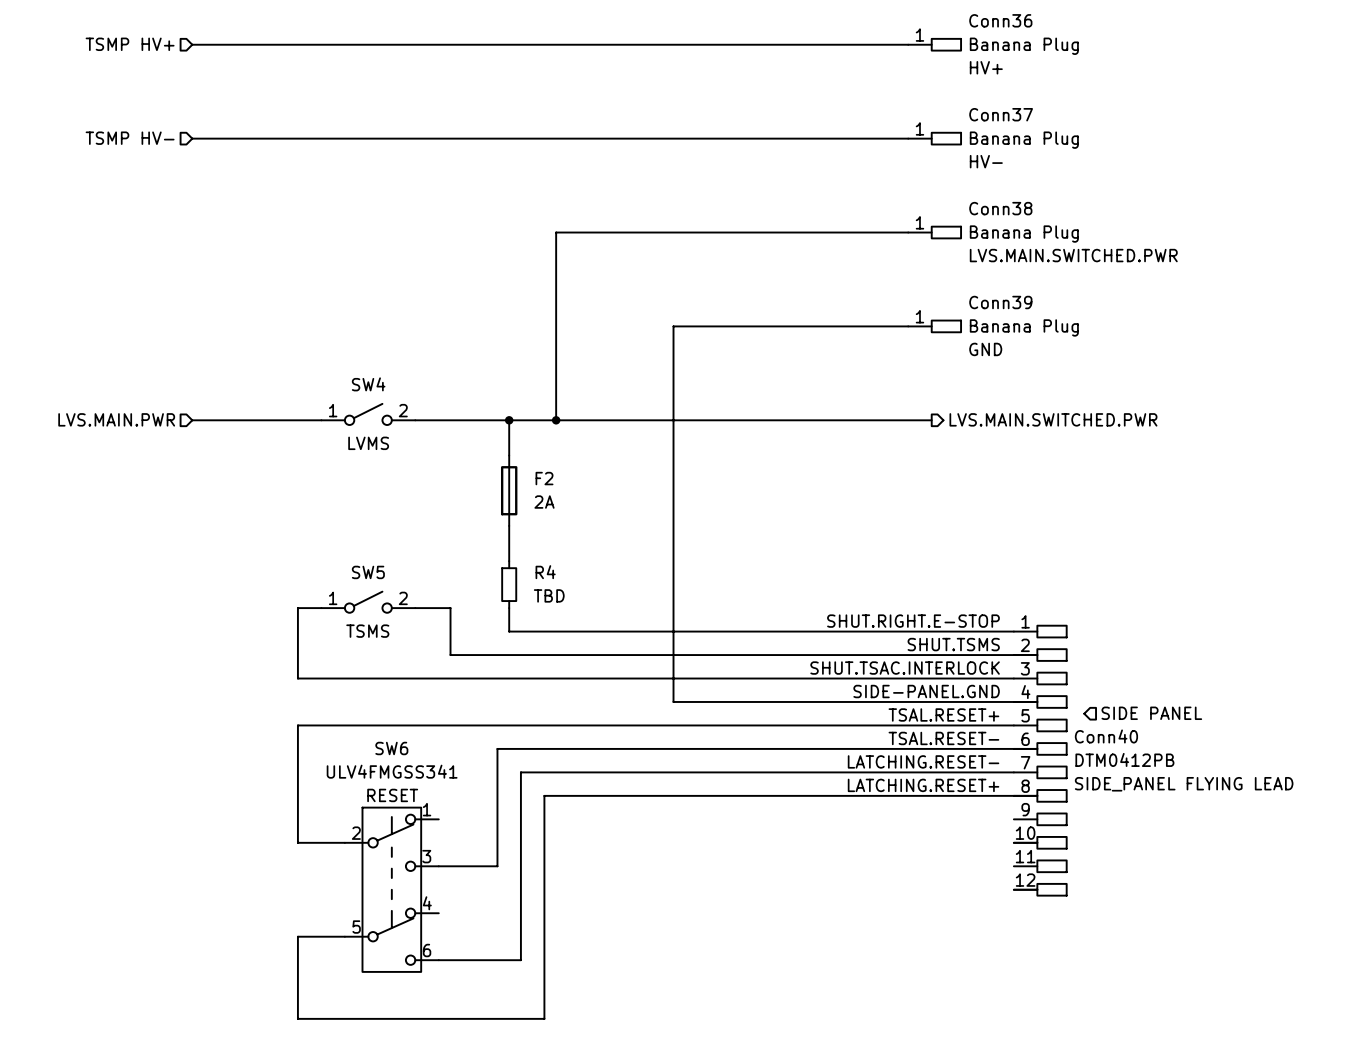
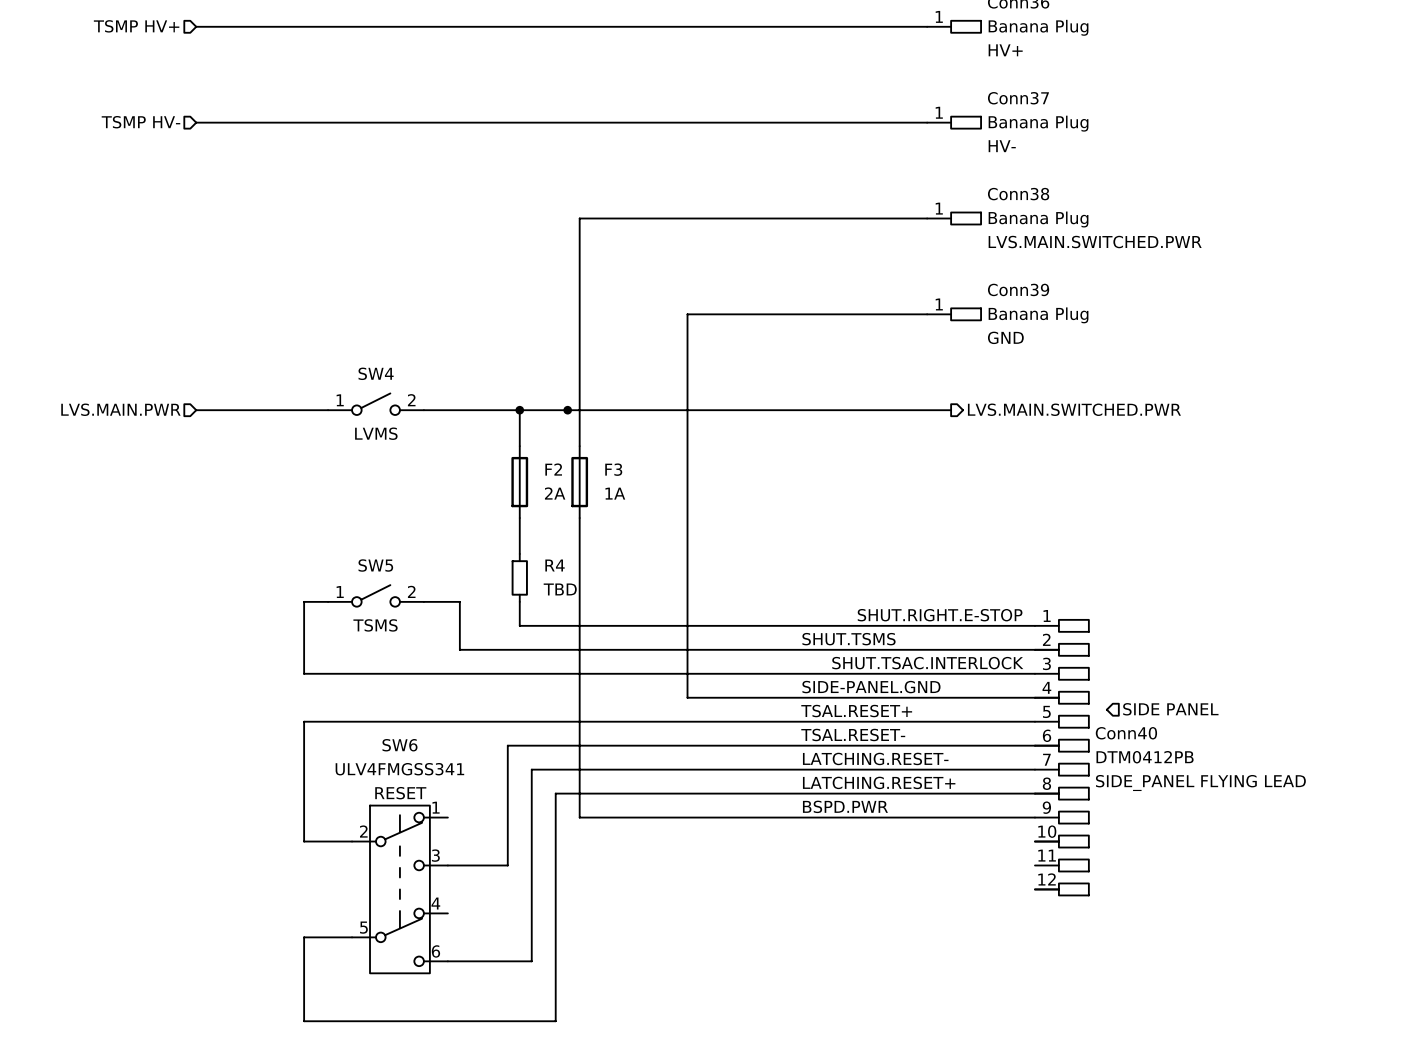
wire: (567, 232) (556, 232) (556, 420) -> (579, 218) (579, 446)
F3: none -> 1A (579, 482)
wire: none -> (579, 518) (579, 817) (1034, 817)
label position: SHUT.TSMS (953, 644) -> SHUT.TSMS (849, 639)
label position: SIDE-PANEL.GND (926, 691) -> SIDE-PANEL.GND (871, 687)
label position: TSAL.RESET+ (943, 714) -> TSAL.RESET+ (856, 711)
label position: TSAL.RESET- (943, 738) -> TSAL.RESET- (853, 734)
label position: LATCHING.RESET- (923, 761) -> LATCHING.RESET- (875, 758)
label position: LATCHING.RESET+ (923, 785) -> LATCHING.RESET+ (879, 782)
label: none -> BSPD.PWR (845, 806)

